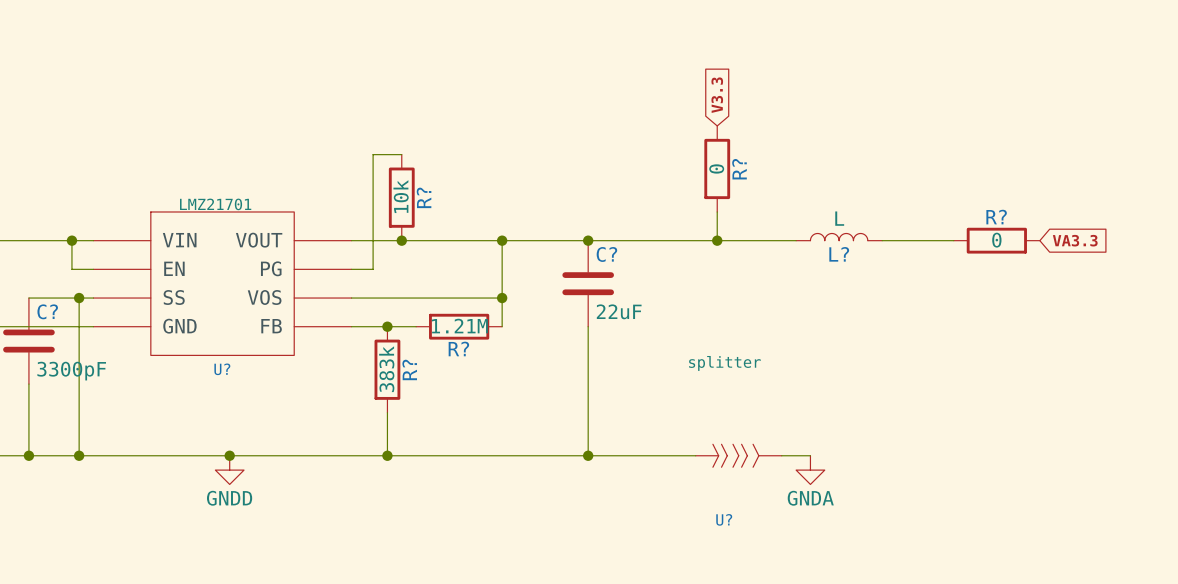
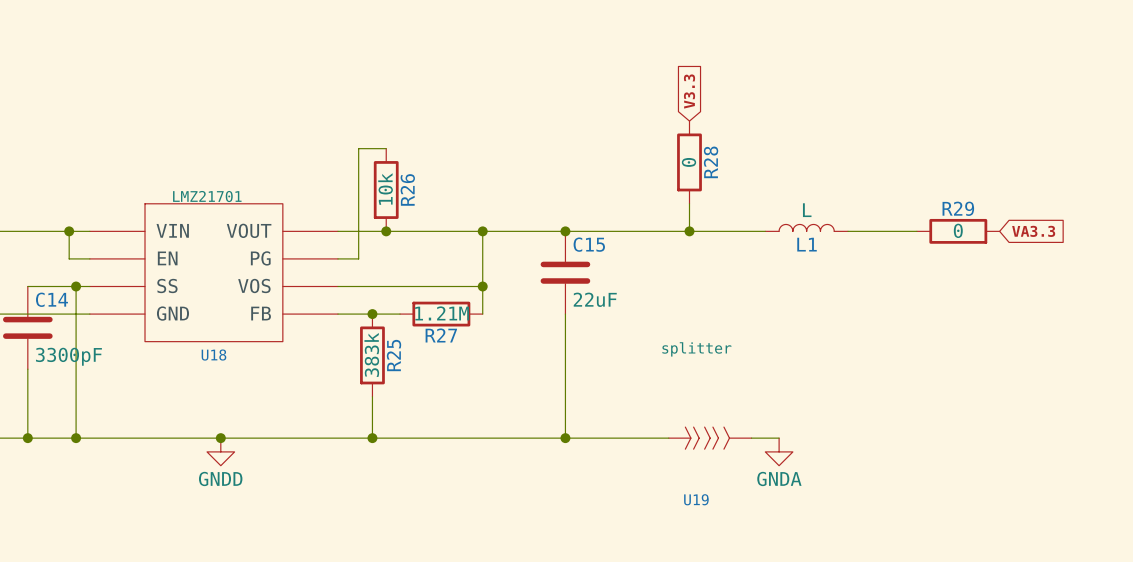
R? name: R? (739, 169) -> R28 (711, 162)
R? name: R? (424, 197) -> R26 (407, 189)
R? name: R? (996, 217) -> R29 (958, 208)
C? name: C? (606, 254) -> C15 (589, 244)
L? name: L? (839, 254) -> L1 (807, 244)
C? name: C? (47, 311) -> C14 (51, 299)
R? name: R? (458, 348) -> R27 (441, 335)
U? name: U? (222, 369) -> U18 (213, 355)
R? name: R? (409, 369) -> R25 (394, 355)
U? name: U? (724, 519) -> U19 (696, 499)

